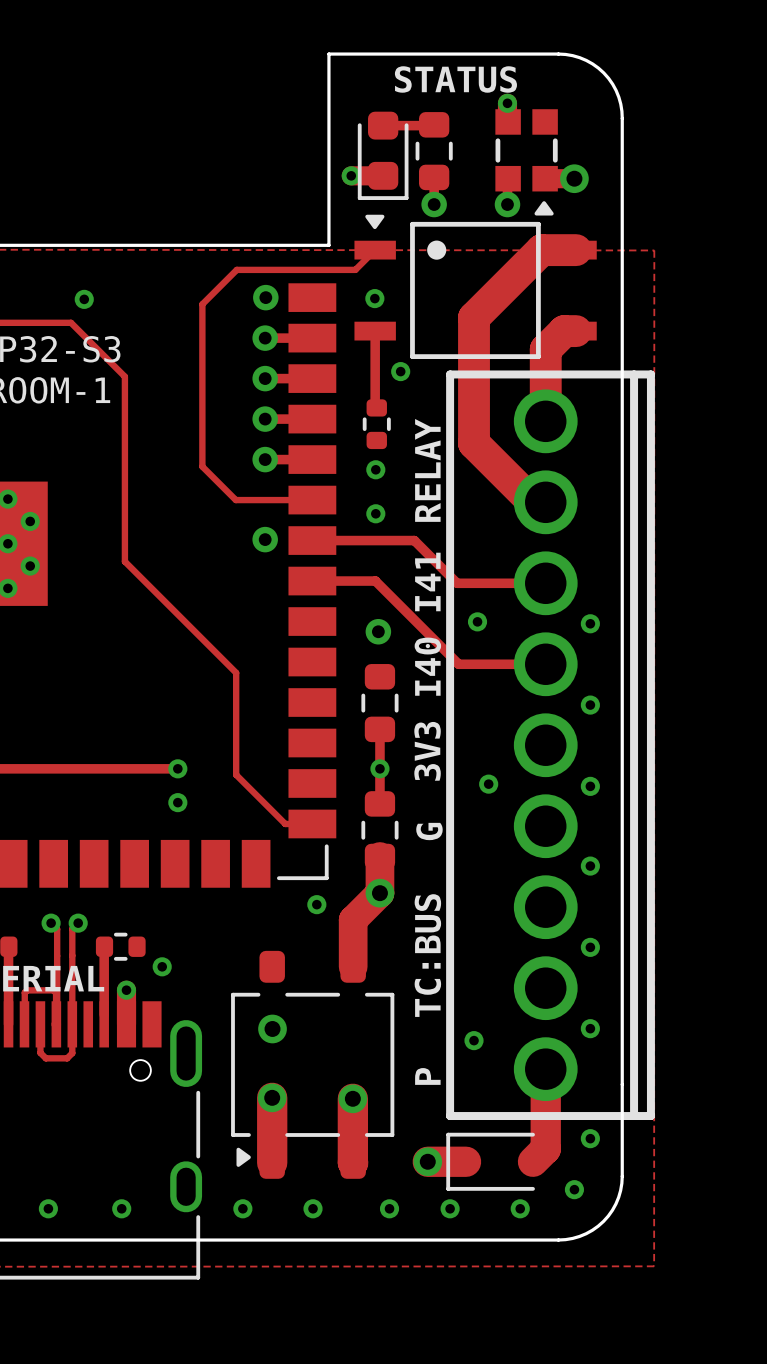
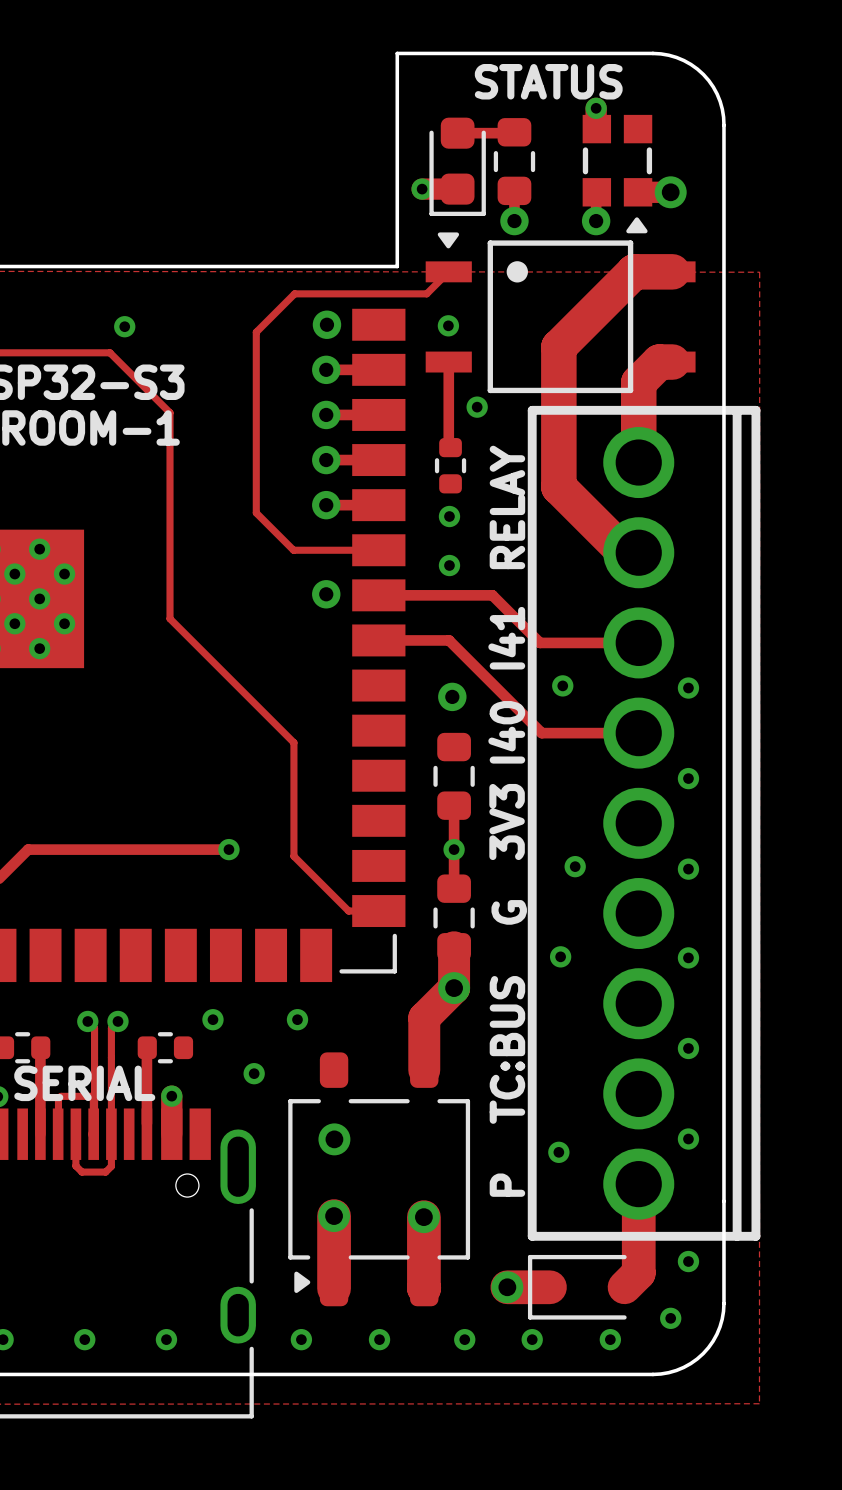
via: (177, 802) -> none
via: none -> (560, 956)
via: (316, 904) -> none
via: none -> (212, 1019)
via: none -> (297, 1019)
via: (162, 966) -> none
via: none -> (254, 1073)

